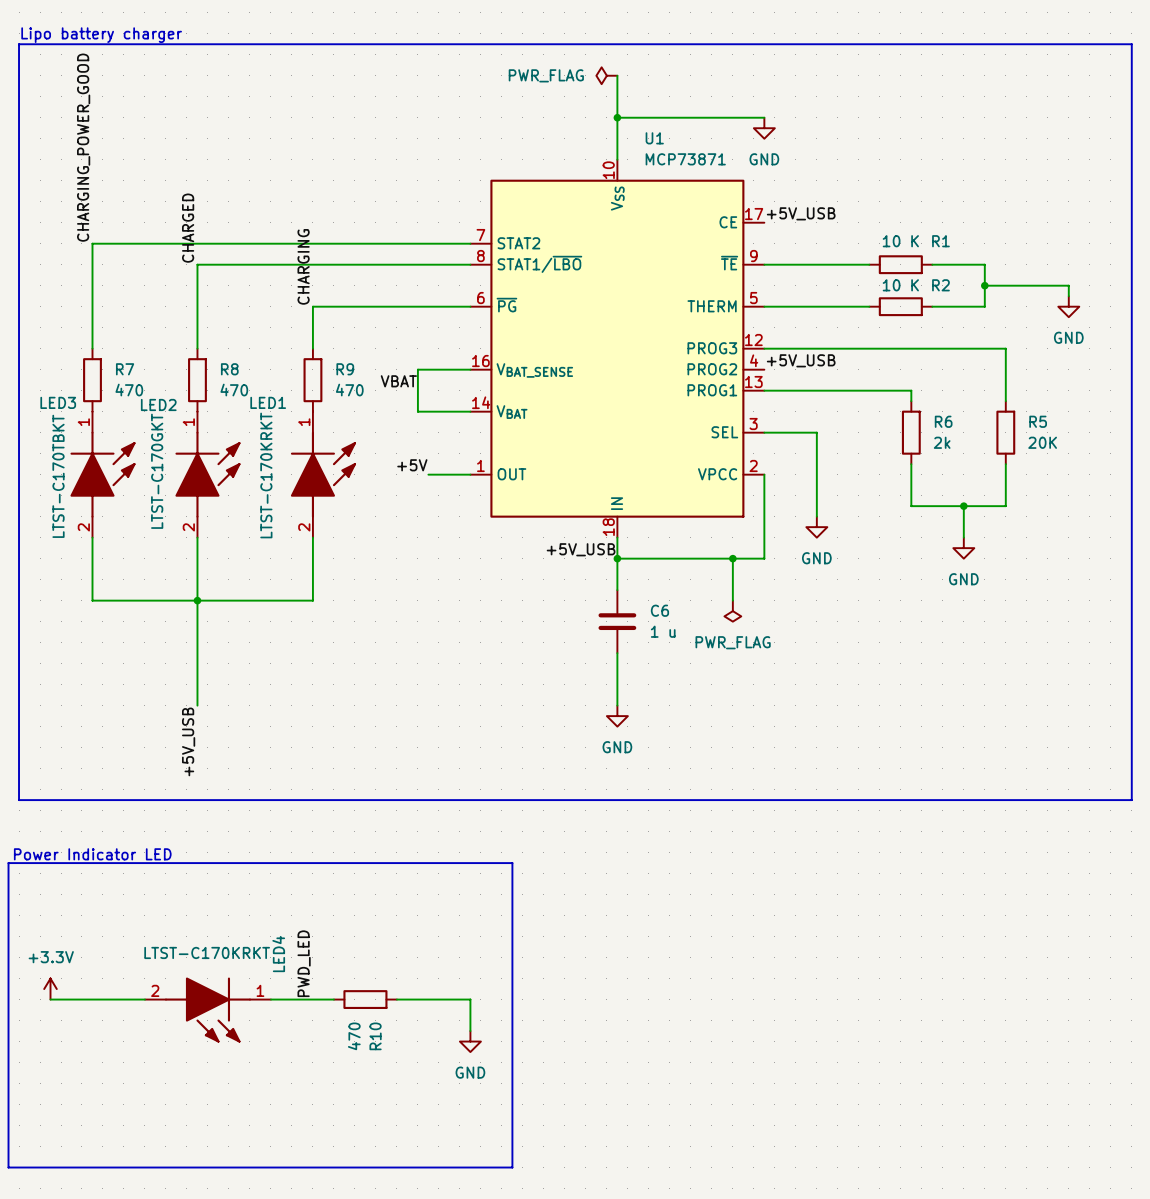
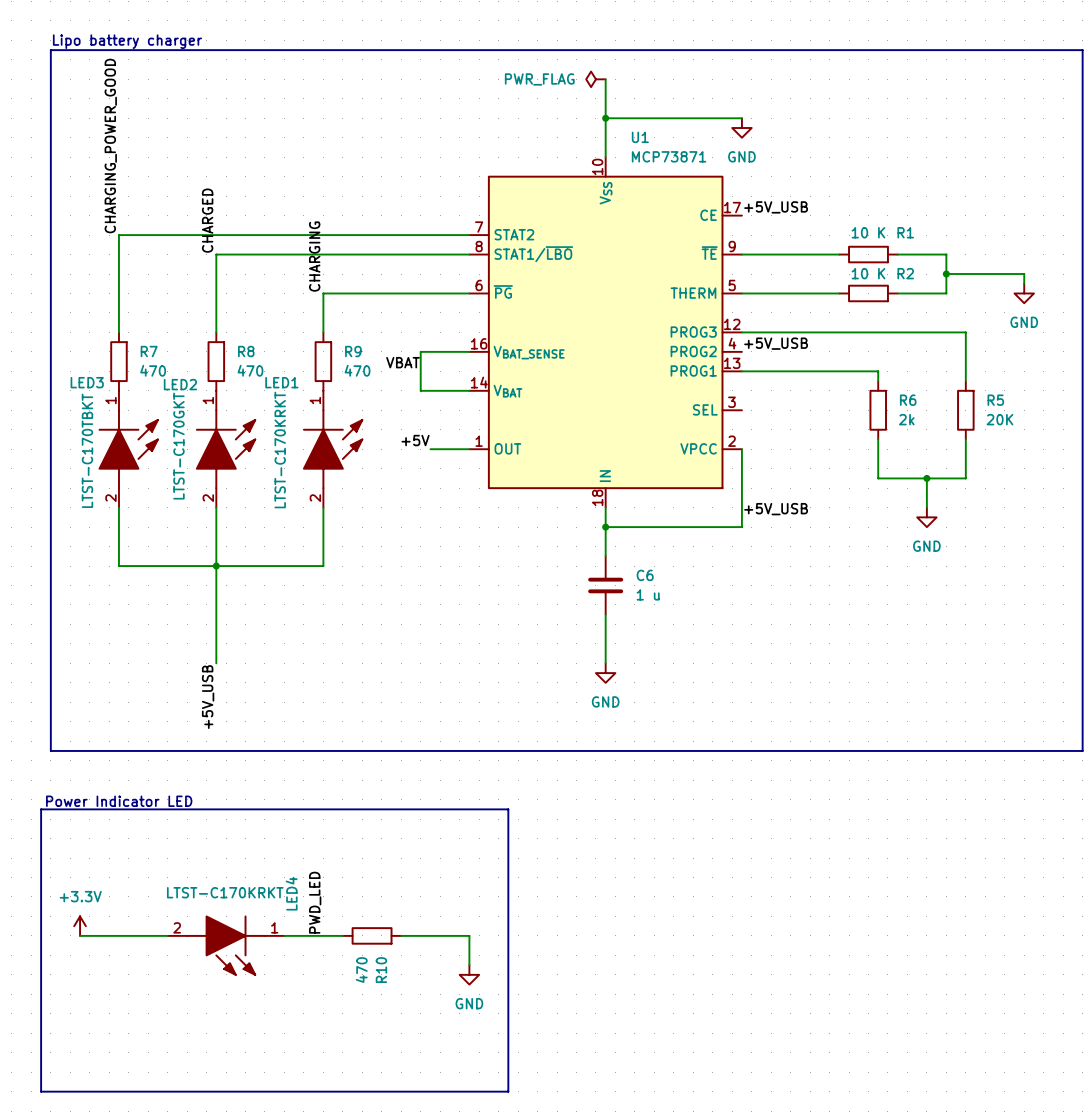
wire: (764, 432) (816, 432) (816, 516) -> none
power symbol: GND (816, 527) -> none
label position: +5V_USB (581, 549) -> +5V_USB (776, 509)
wire: (732, 558) (732, 600) -> none
junction: (732, 558) -> none
power symbol: PWR_FLAG (732, 611) -> none

